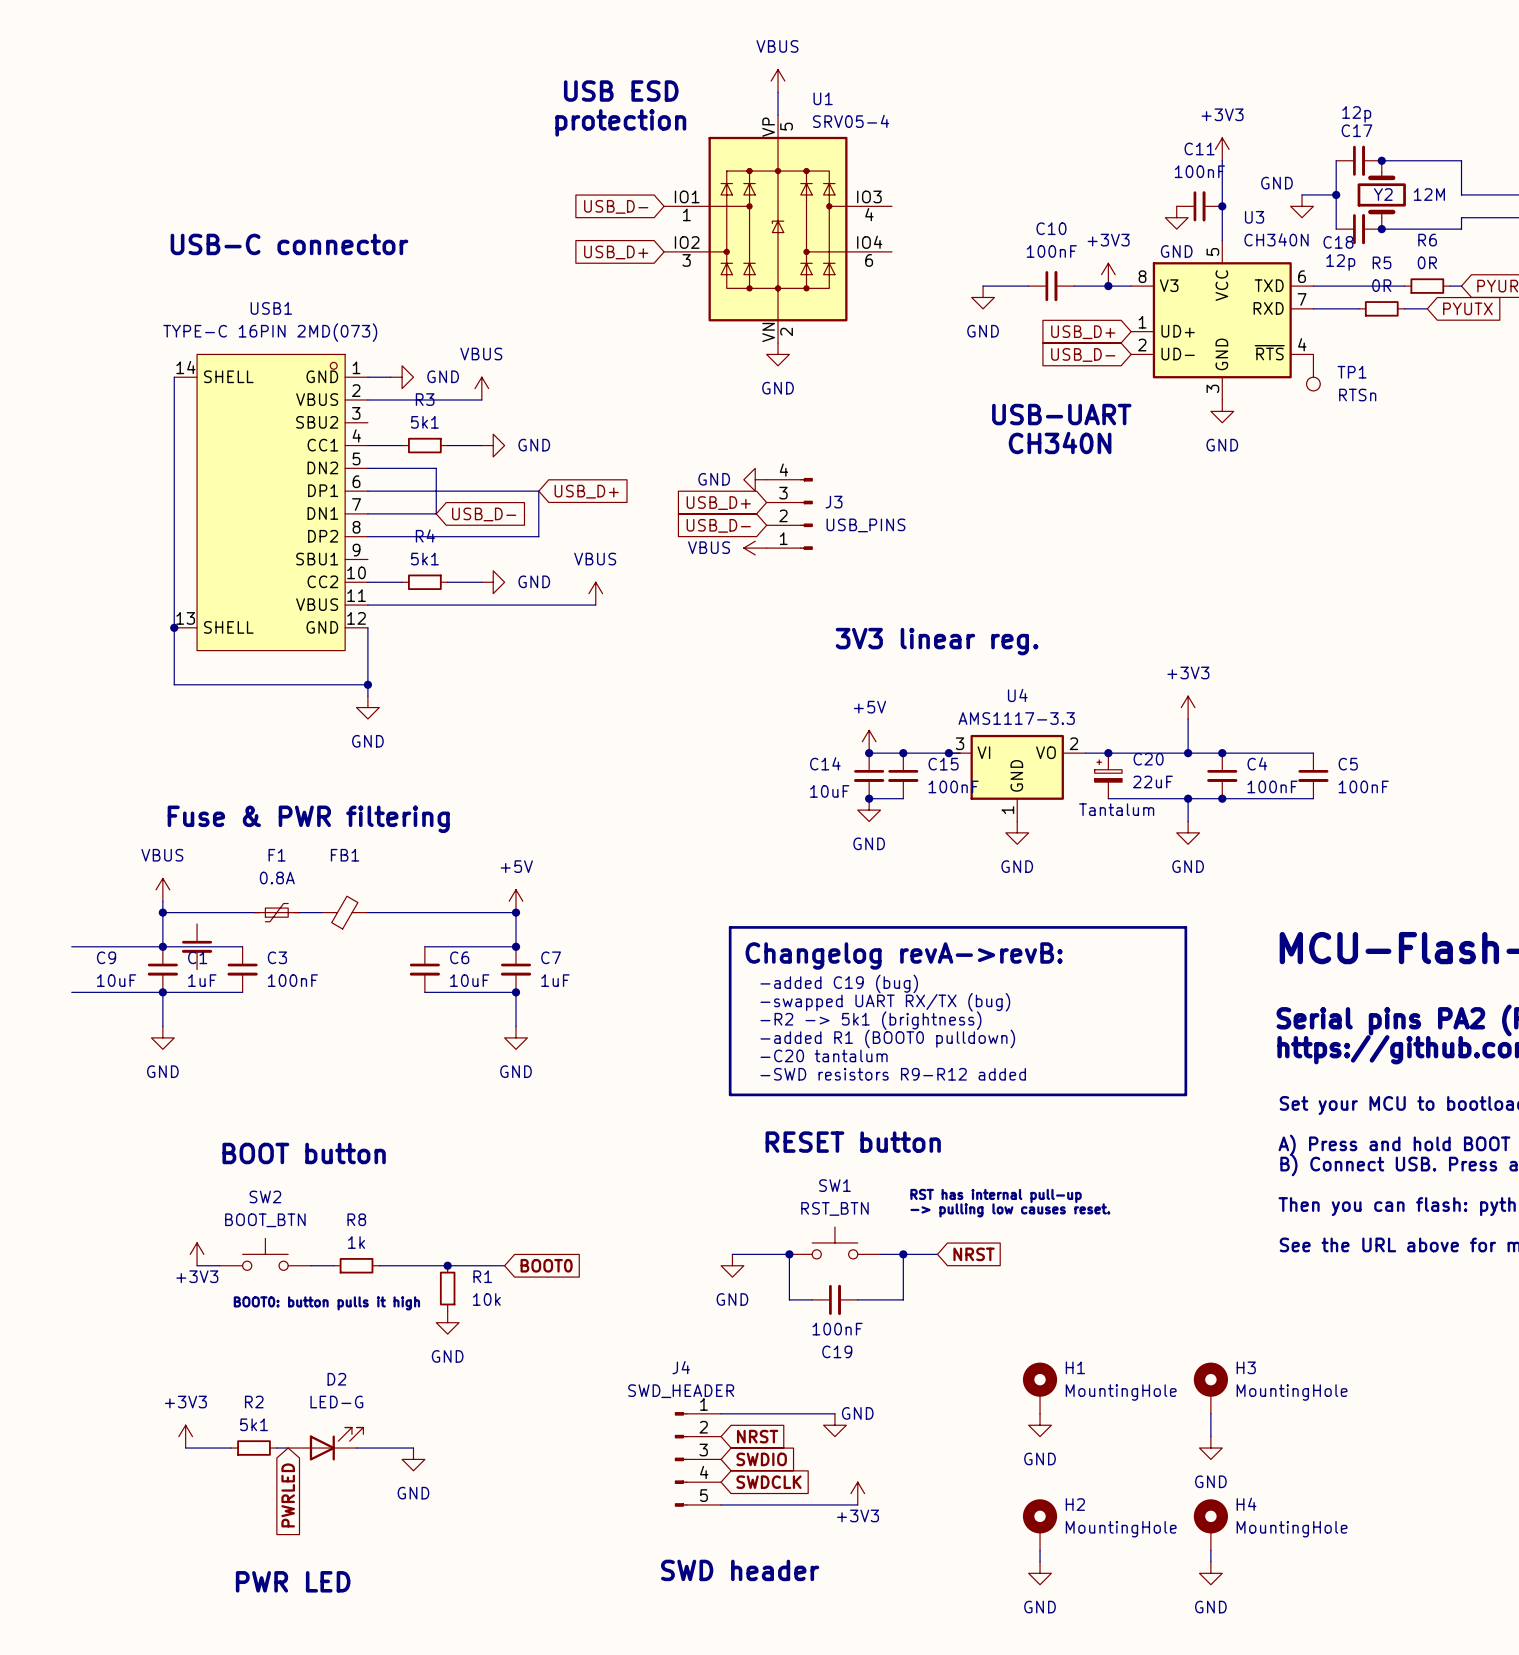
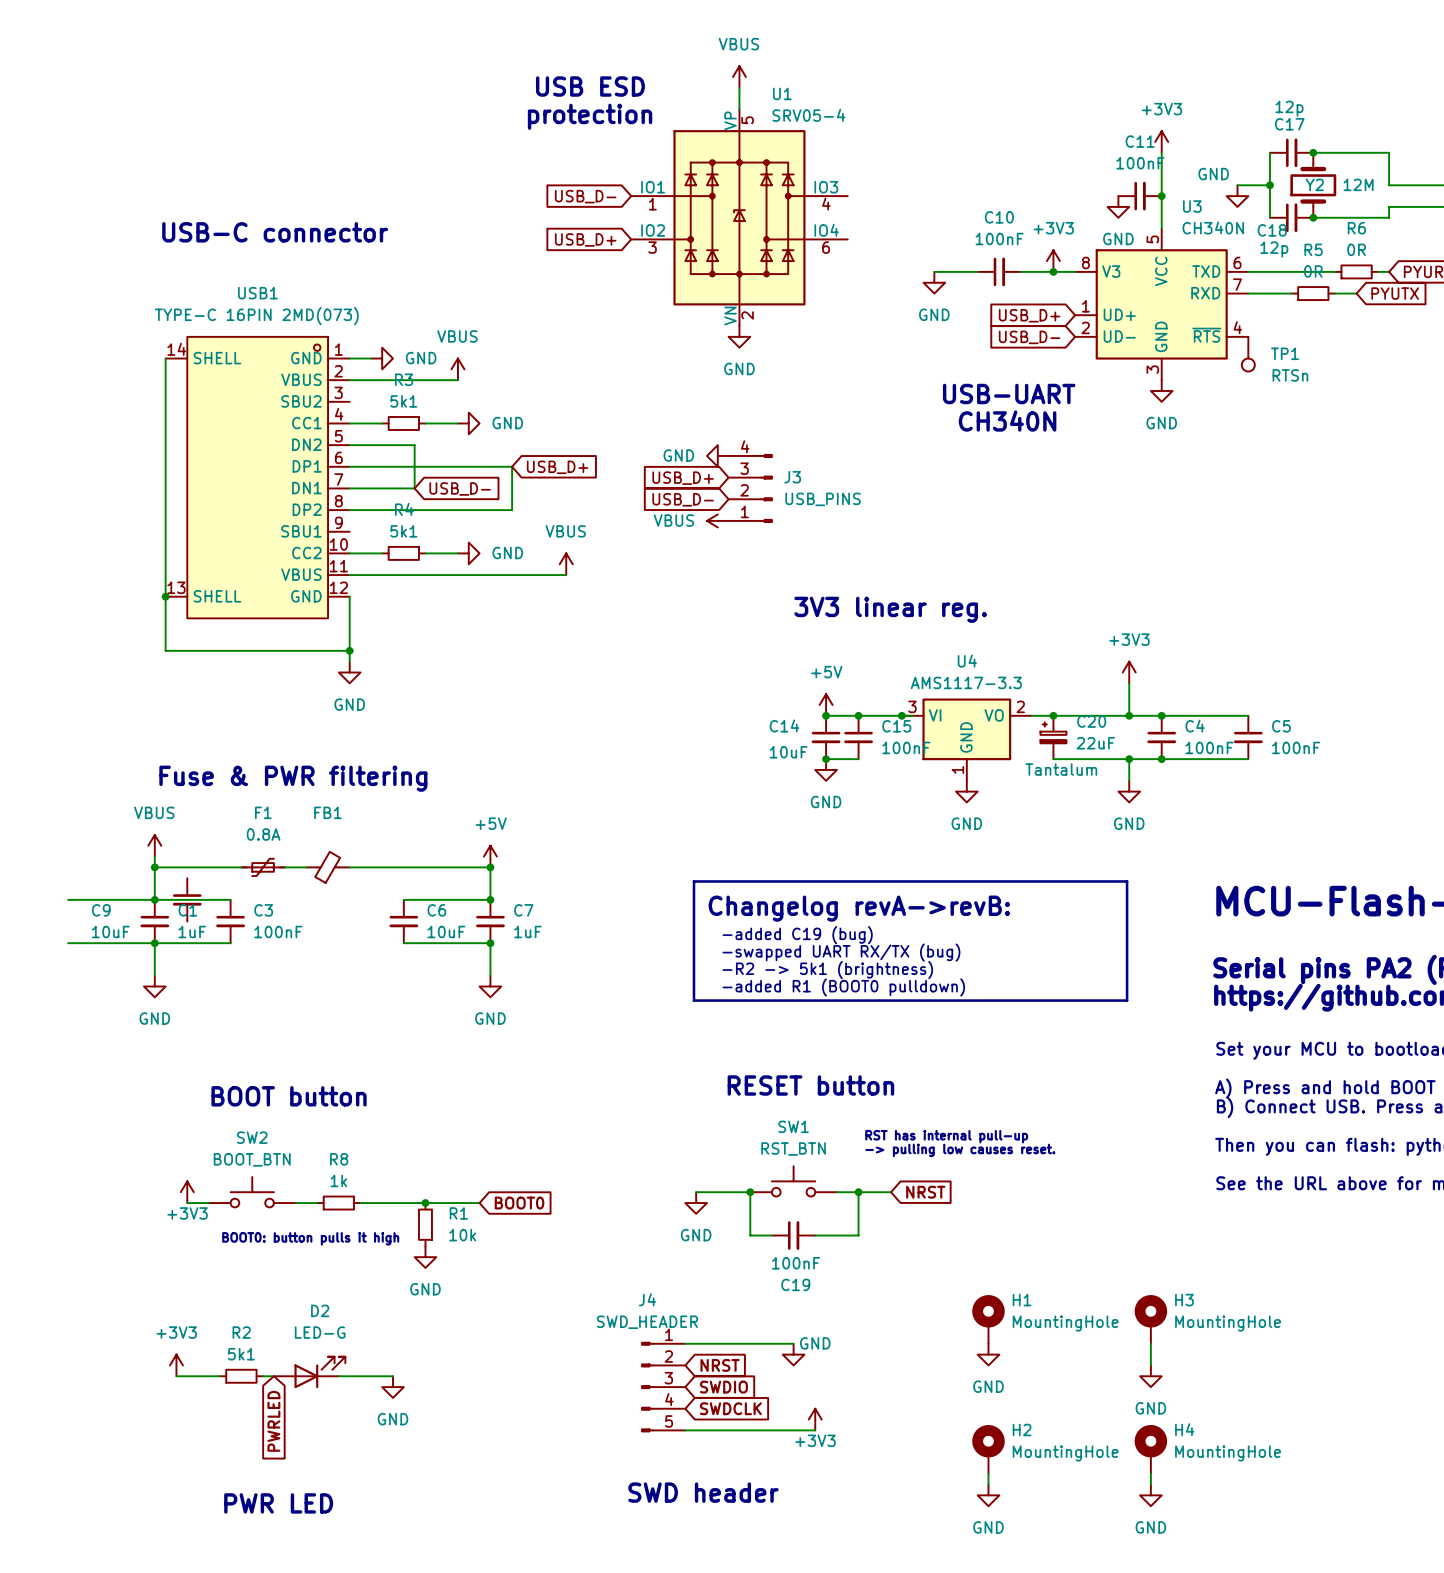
line: (730, 1052) (730, 1094) (1185, 1094) (1185, 1052) -> (693, 1000) (1127, 1000)
text: -C20 tantalum (824, 1055) -> none
text: -SWD resistors R9-R12 added (893, 1074) -> none

